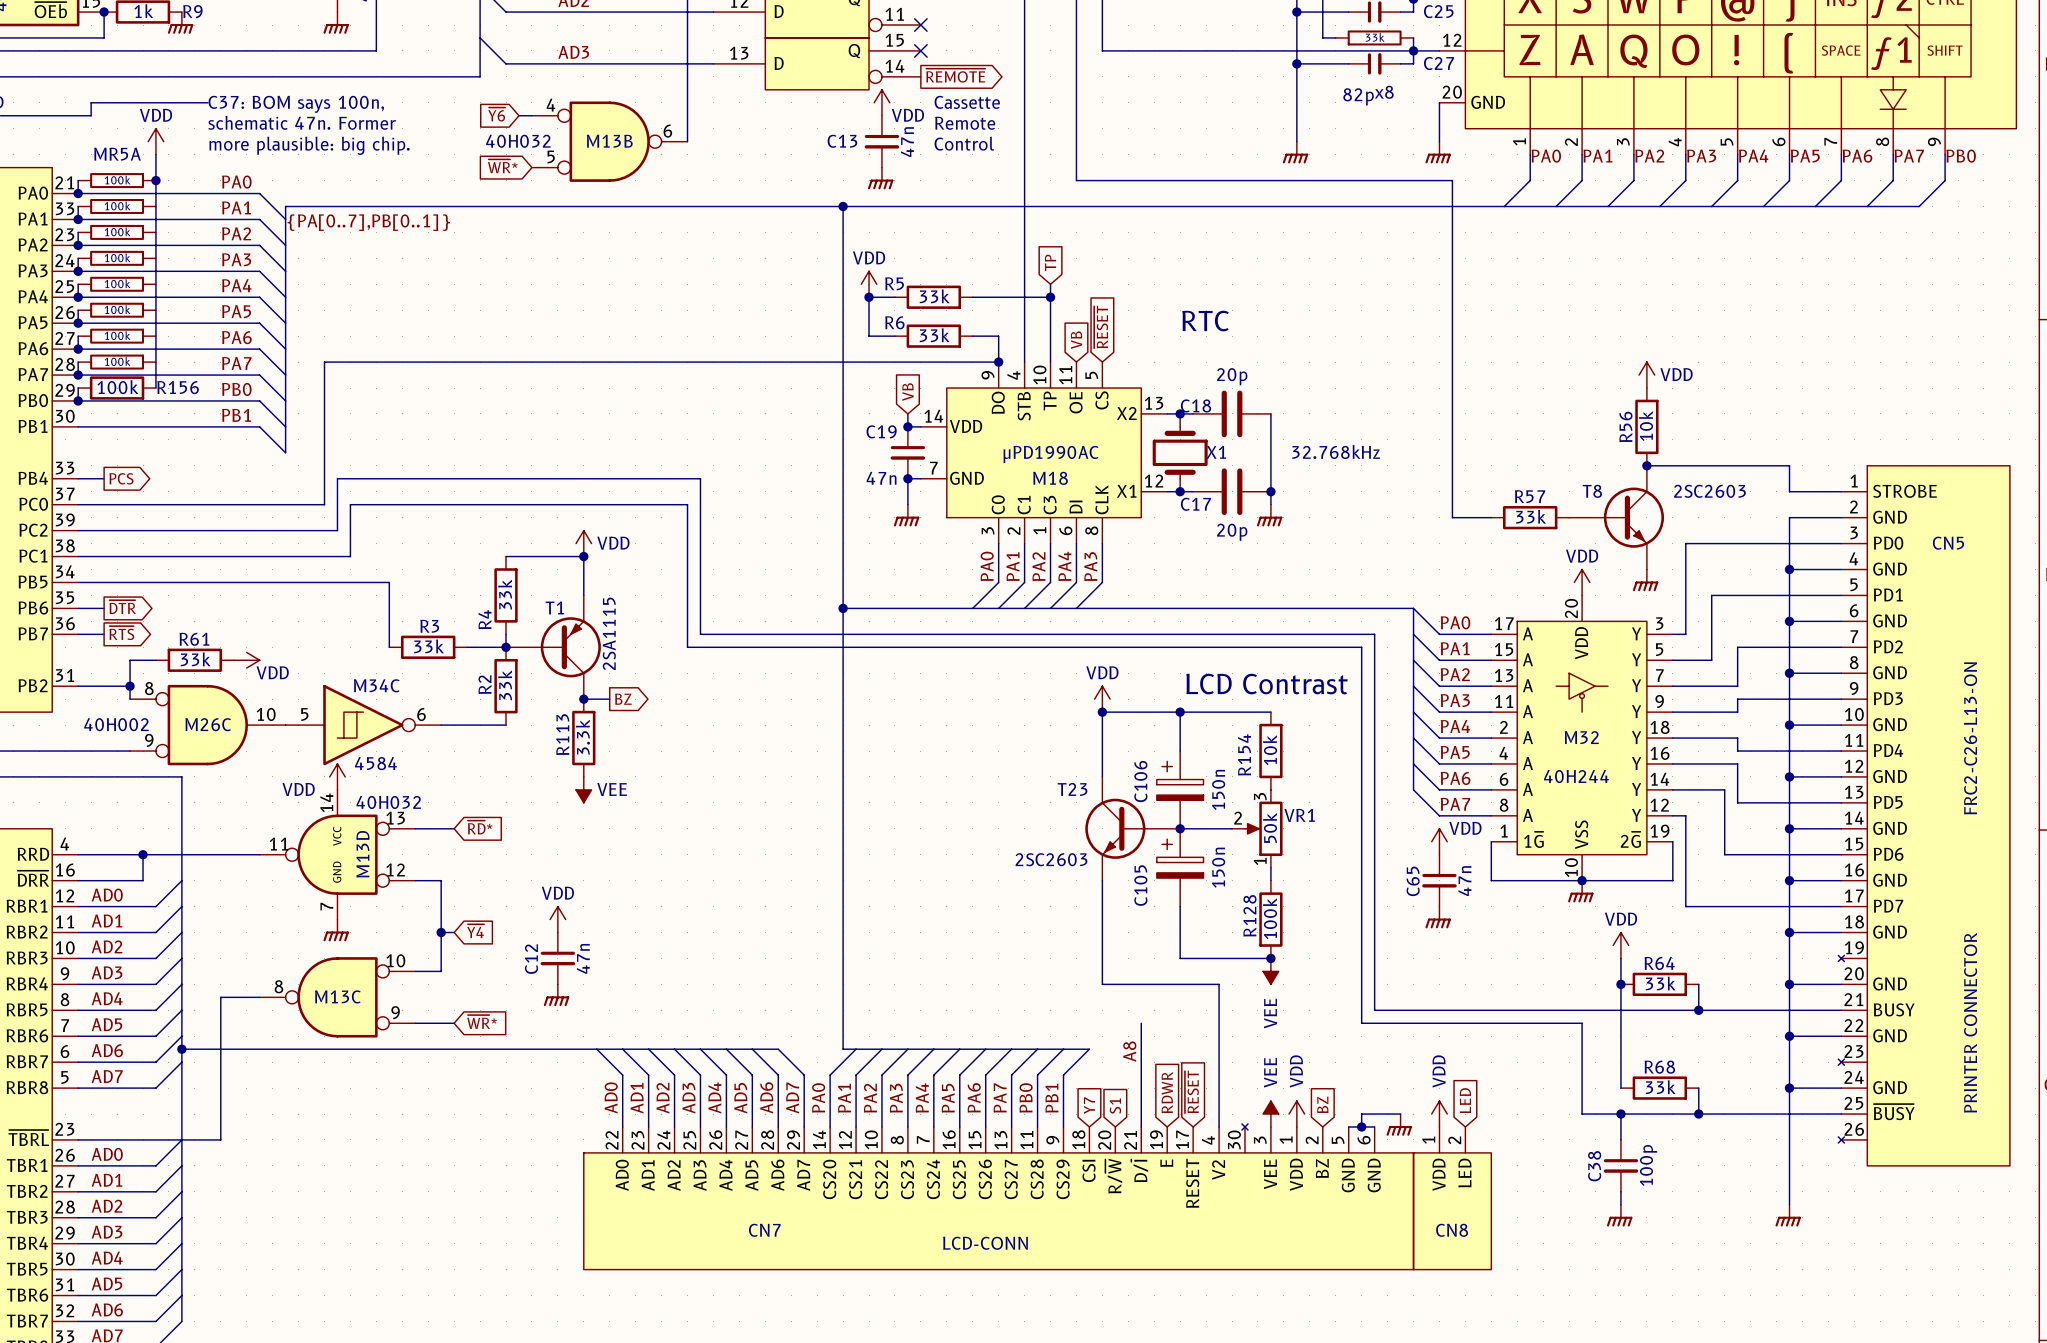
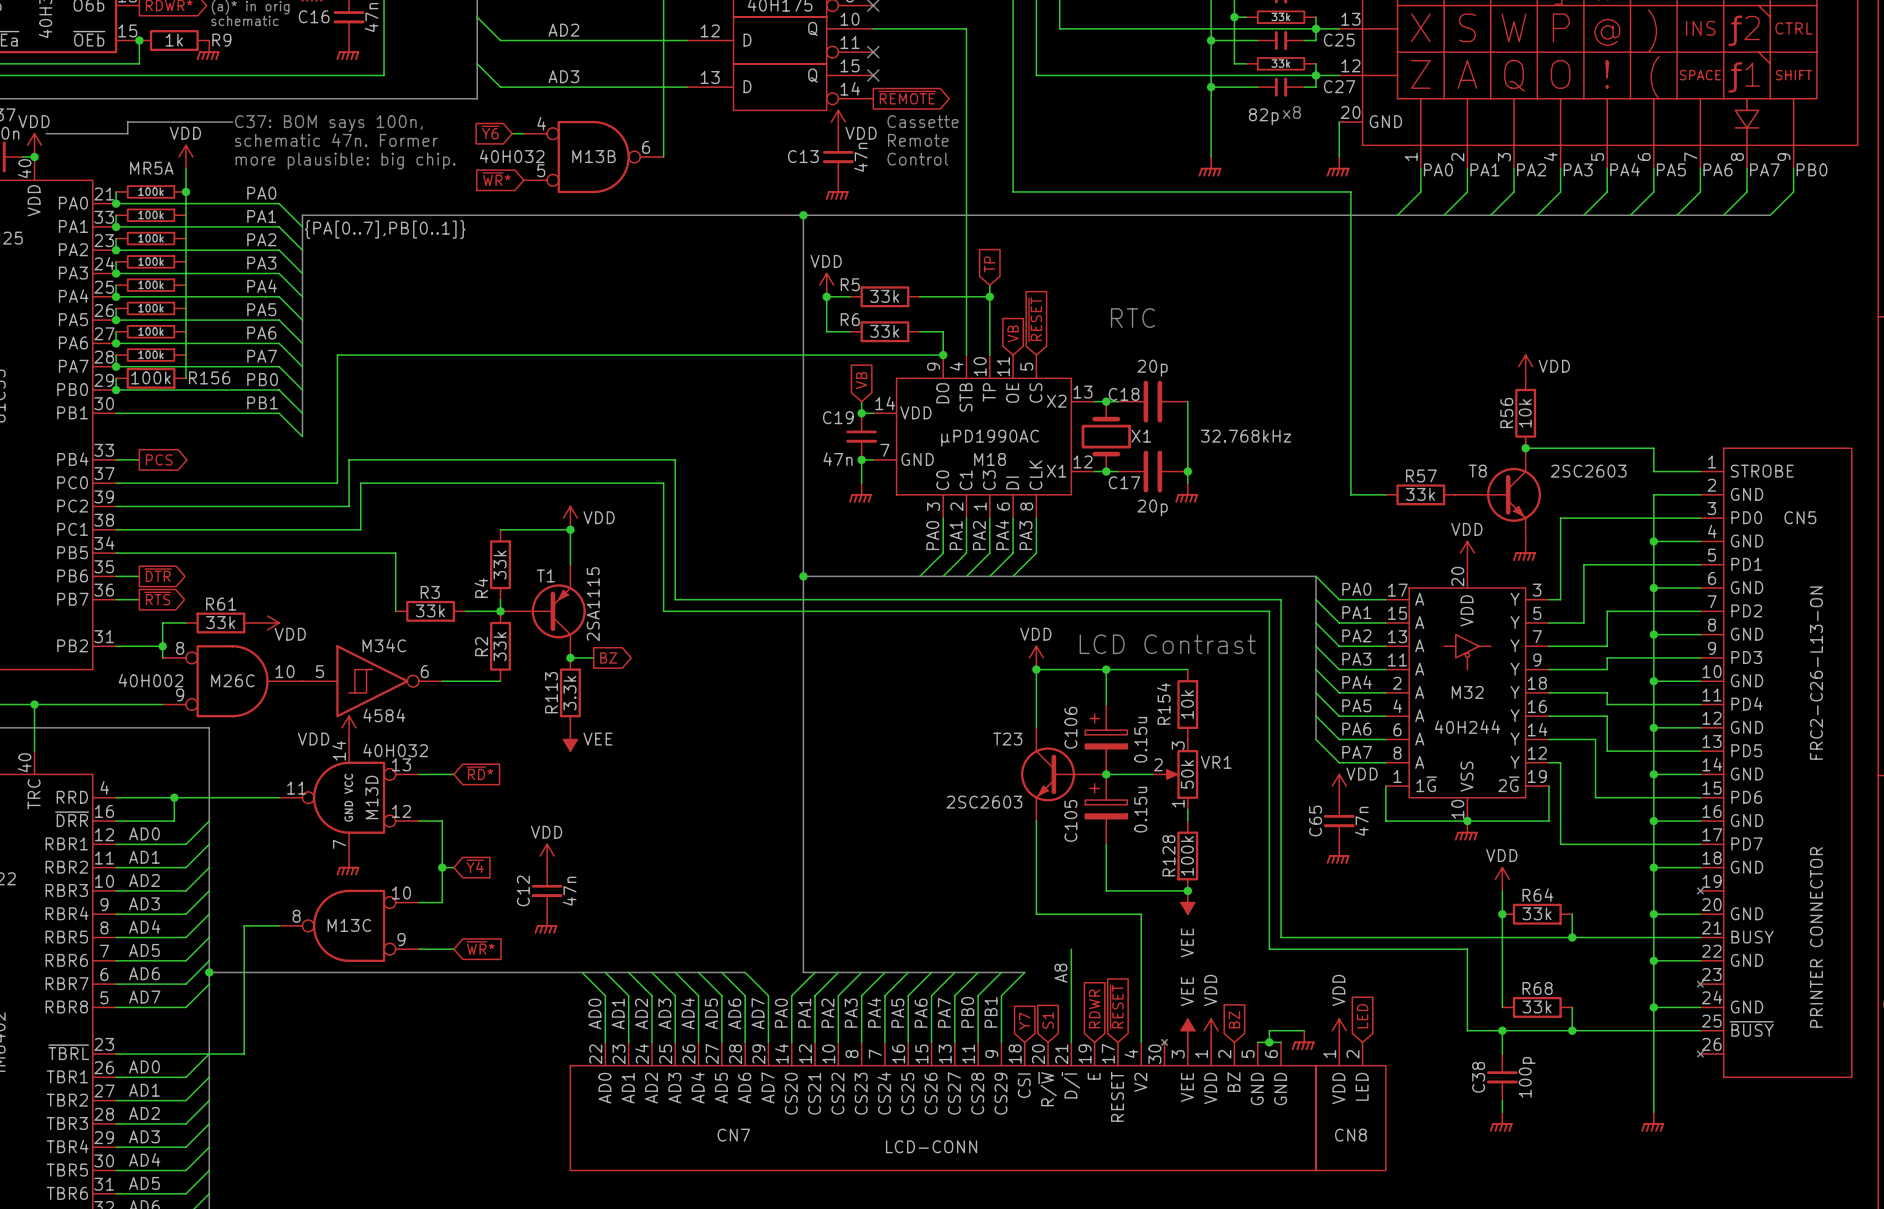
C106 value: 150n (1218, 789) -> 0.15u (1140, 739)
C105 value: 150n (1218, 867) -> 0.15u (1140, 809)

